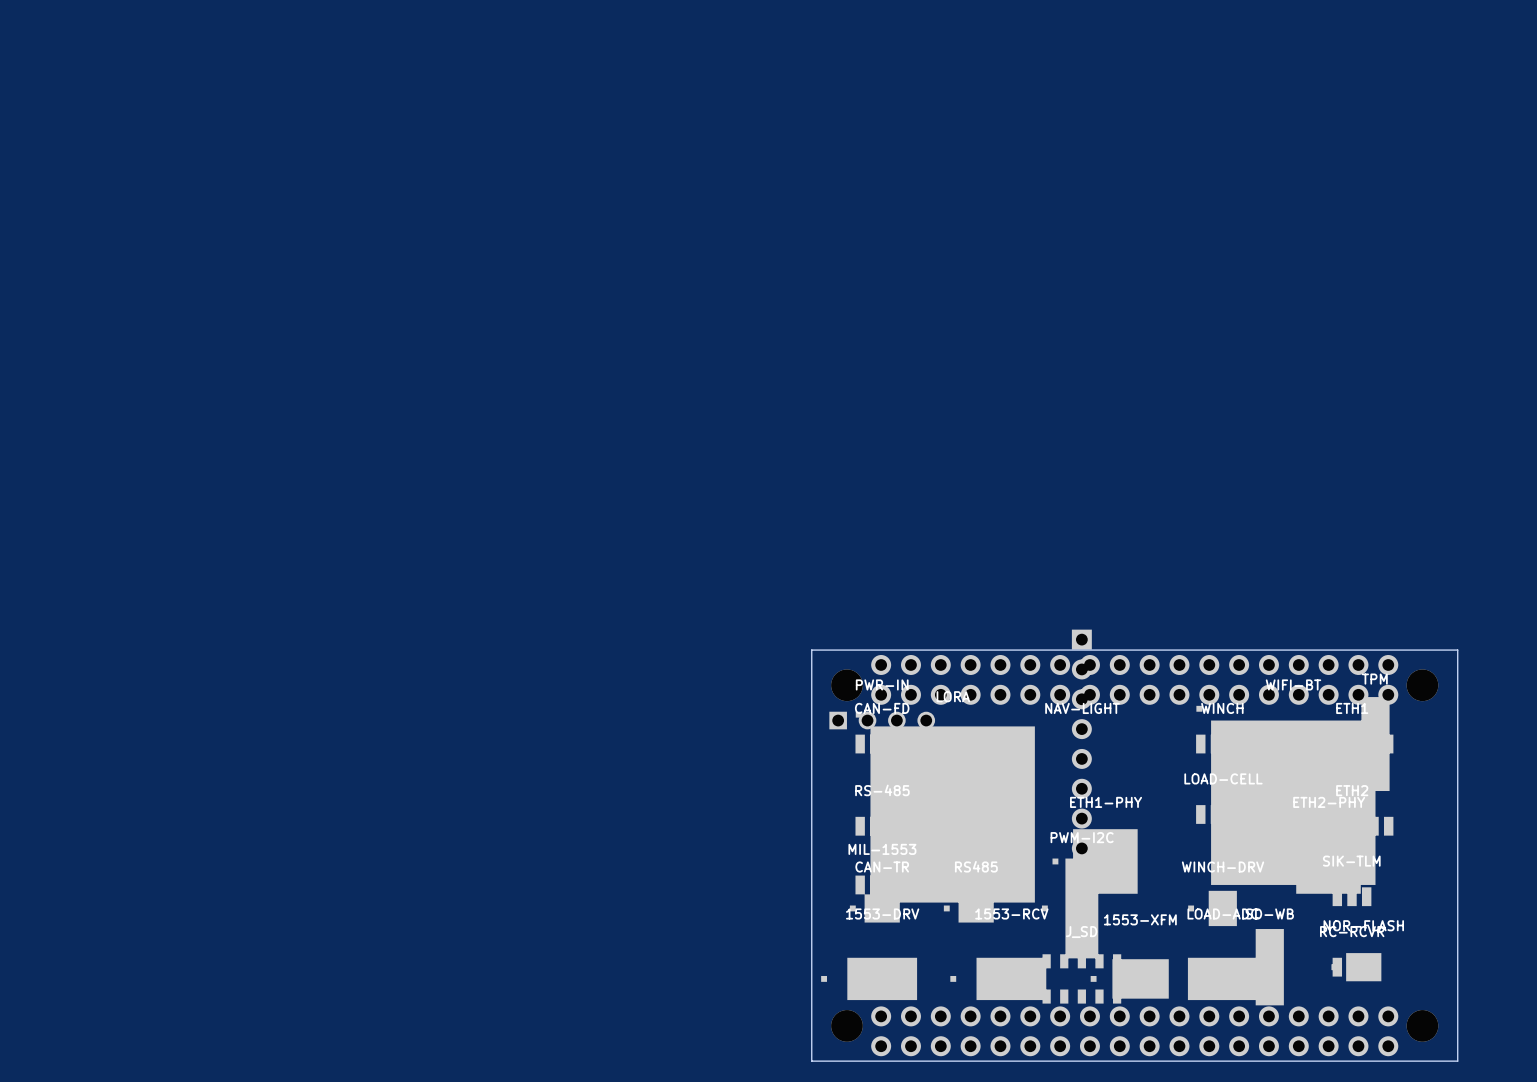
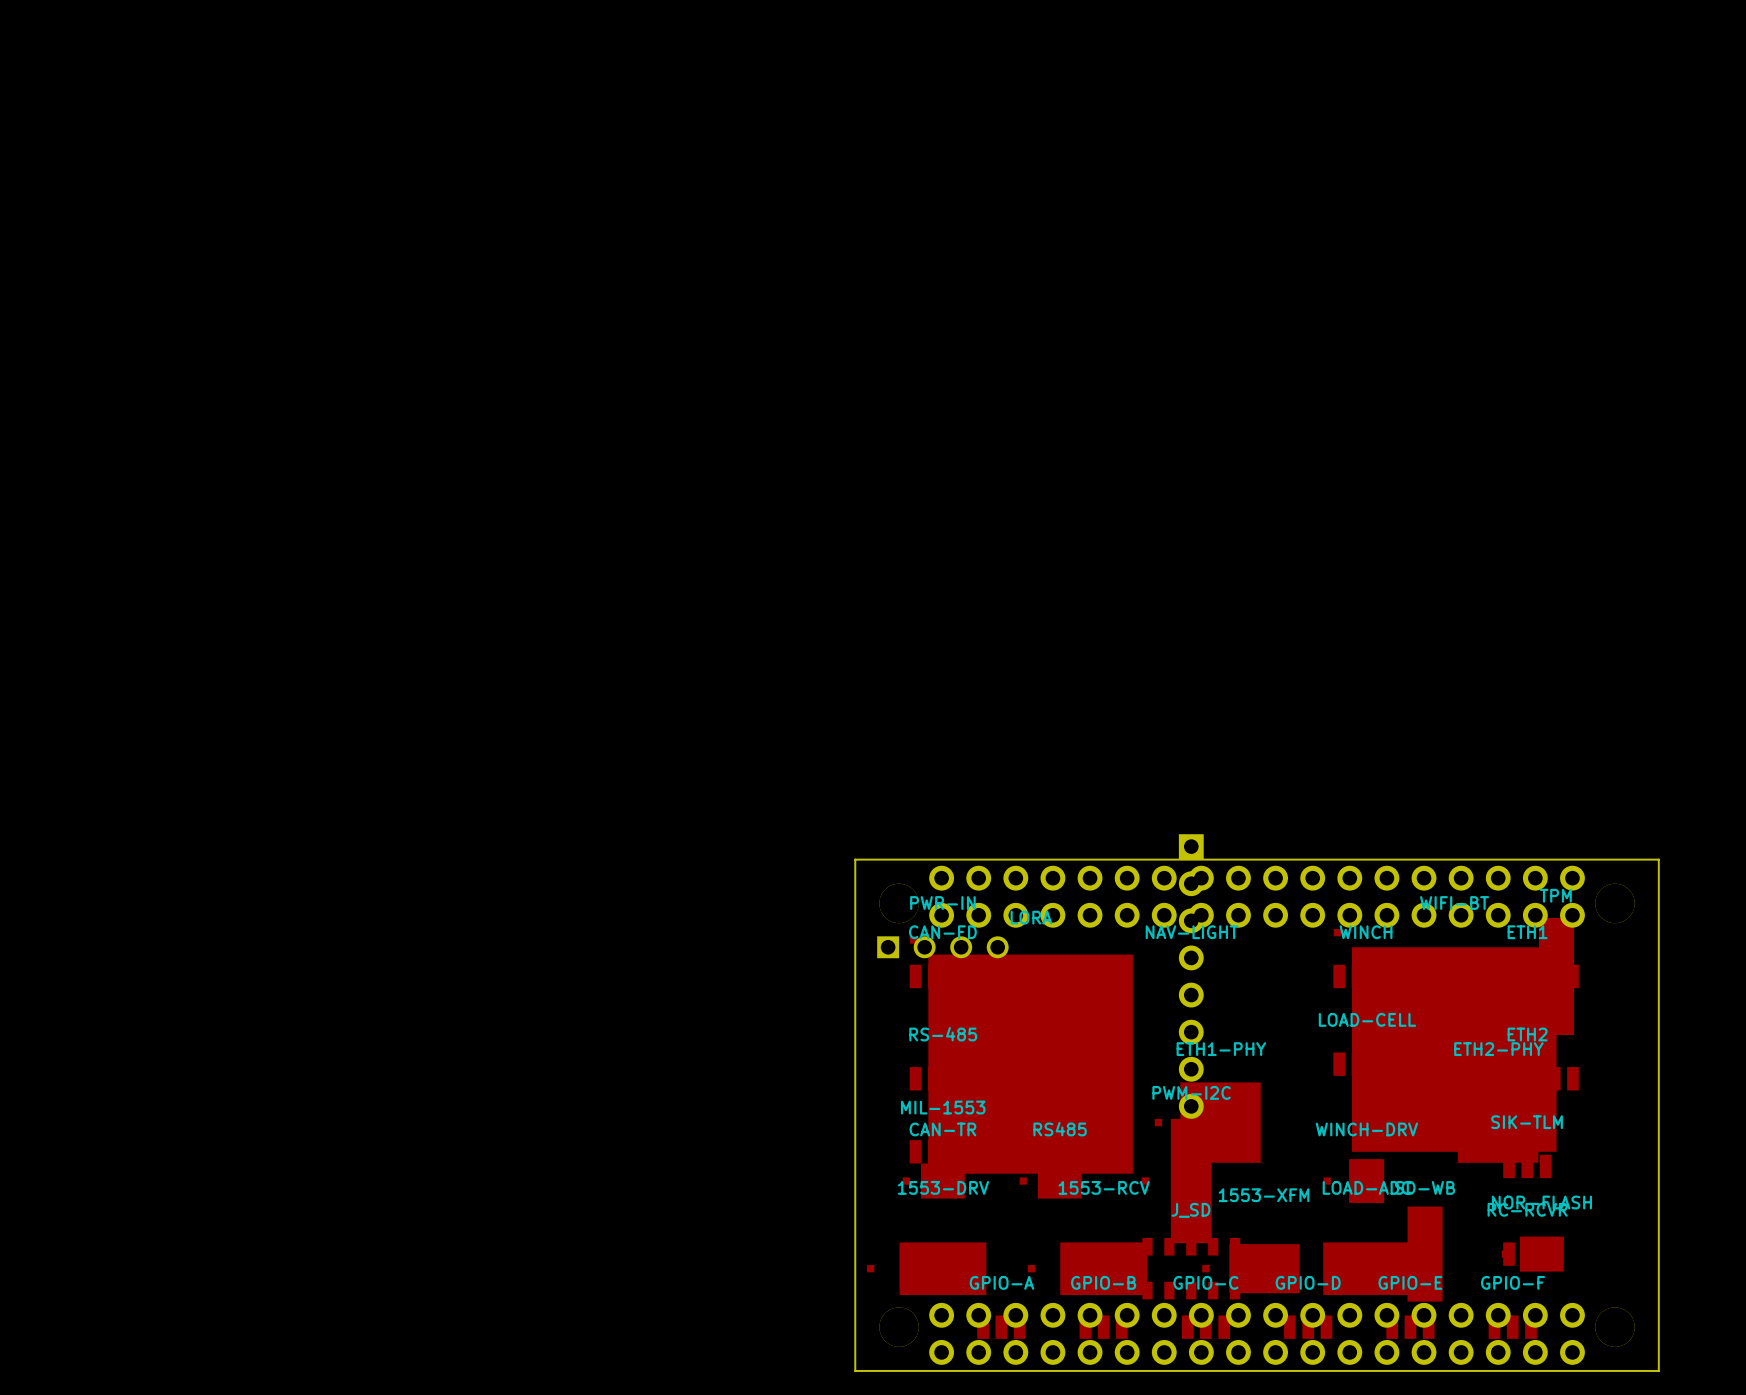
GPIO-A: none -> (1001, 1327)
GPIO-B: none -> (1103, 1327)
GPIO-C: none -> (1205, 1327)
GPIO-D: none -> (1308, 1327)
GPIO-E: none -> (1410, 1327)
GPIO-F: none -> (1512, 1327)

